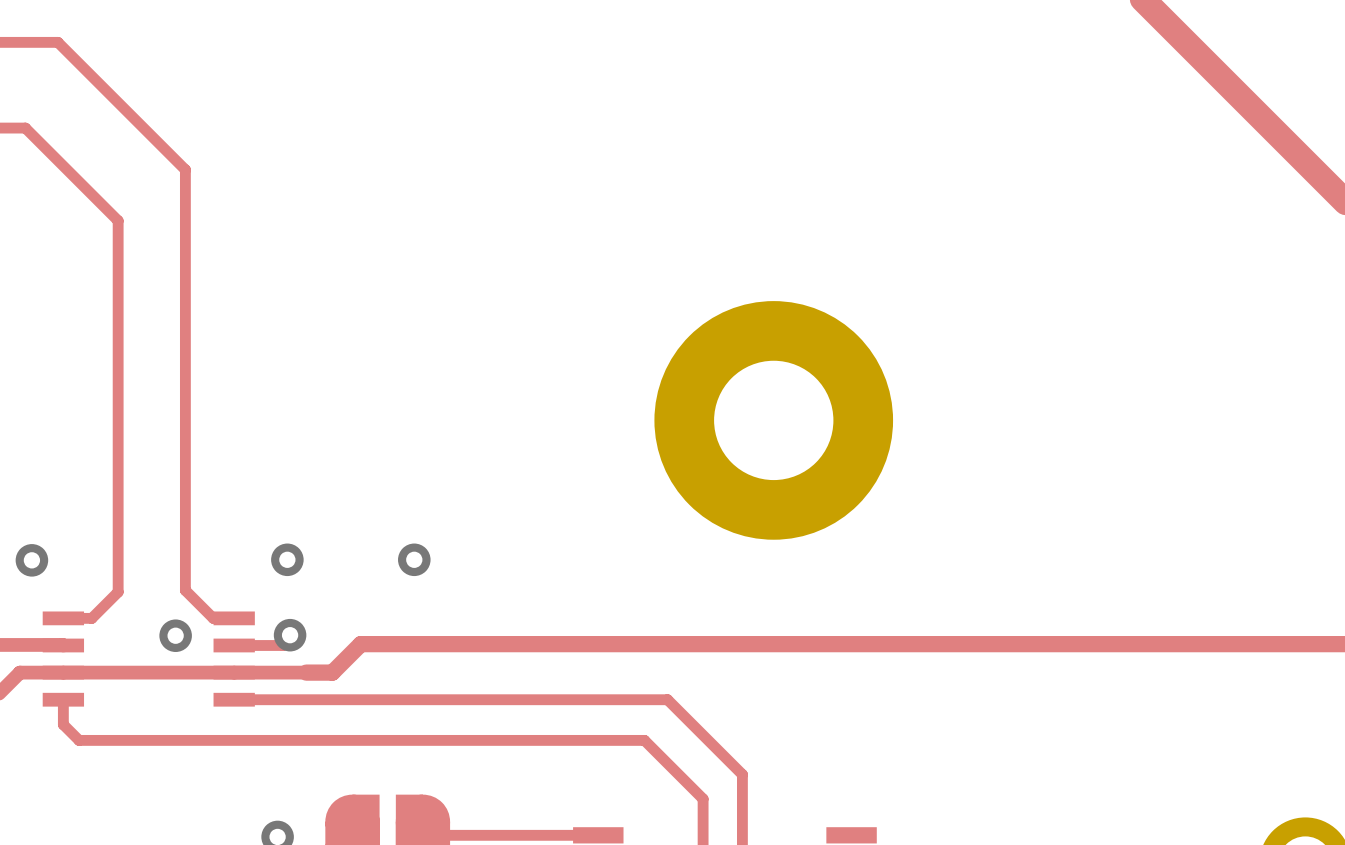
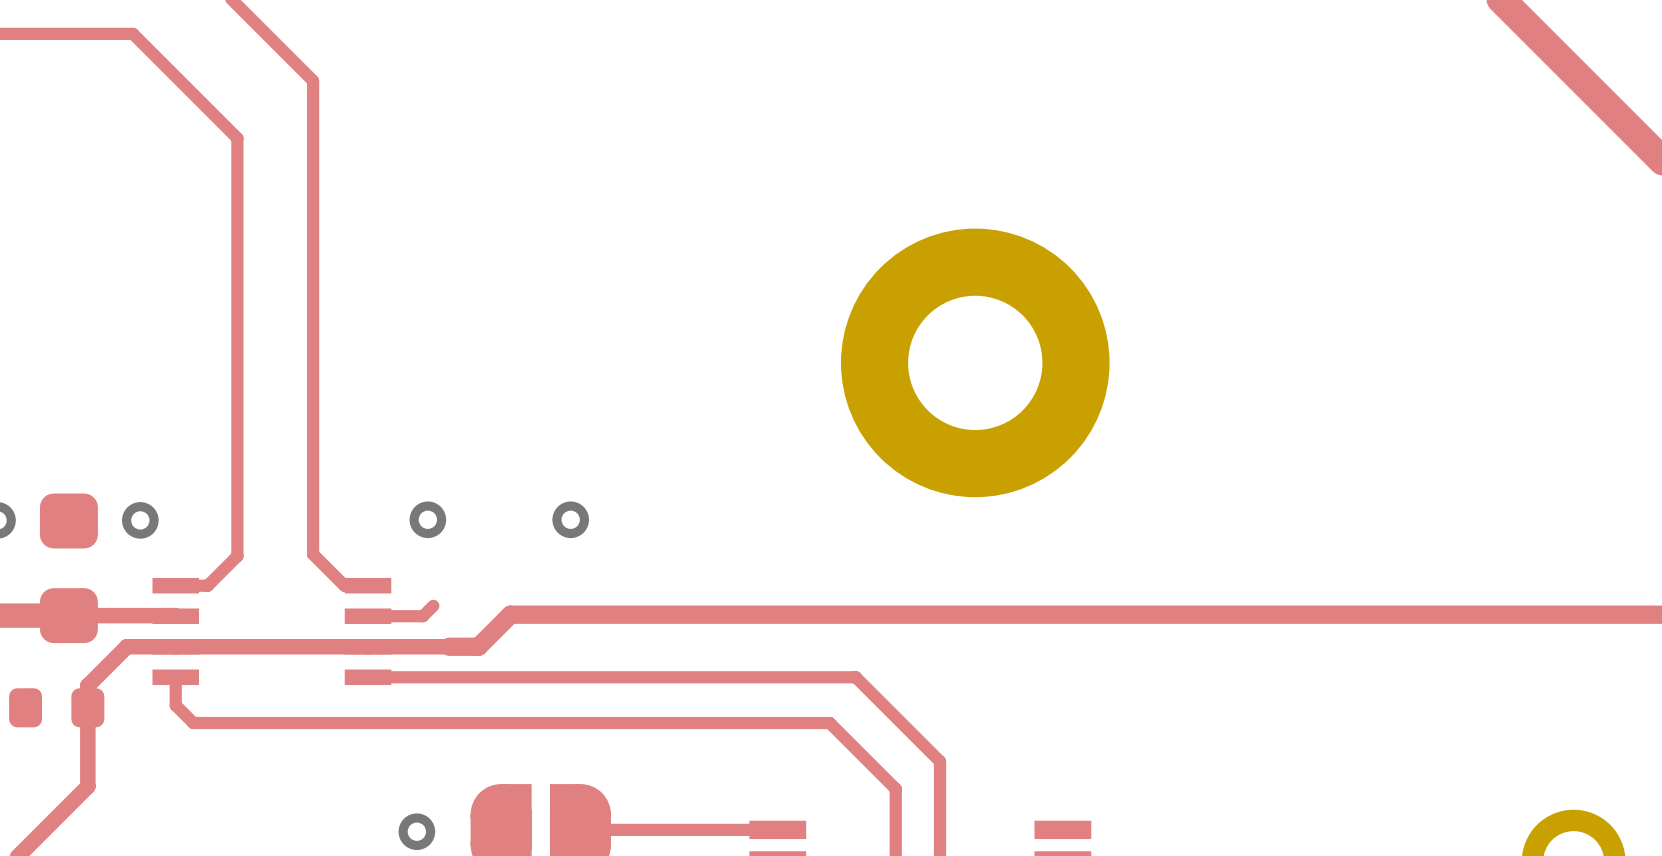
via: (175, 635) -> none
via: (290, 635) -> none

